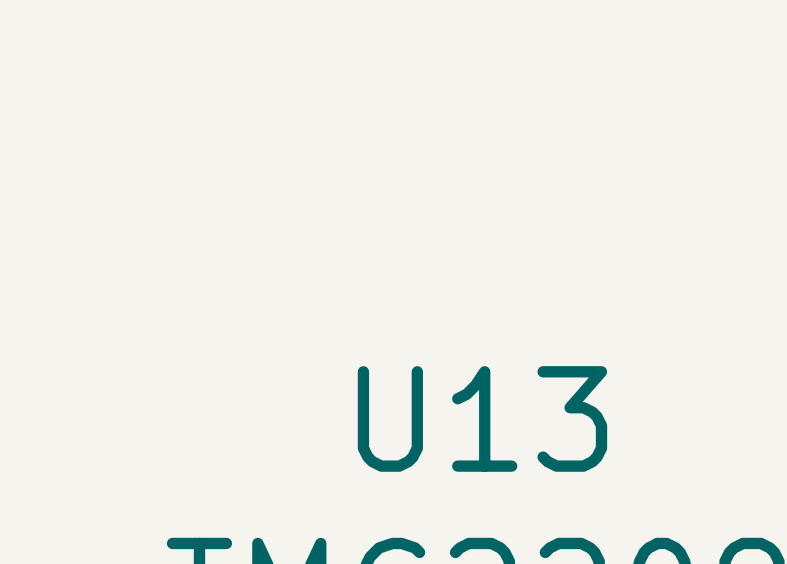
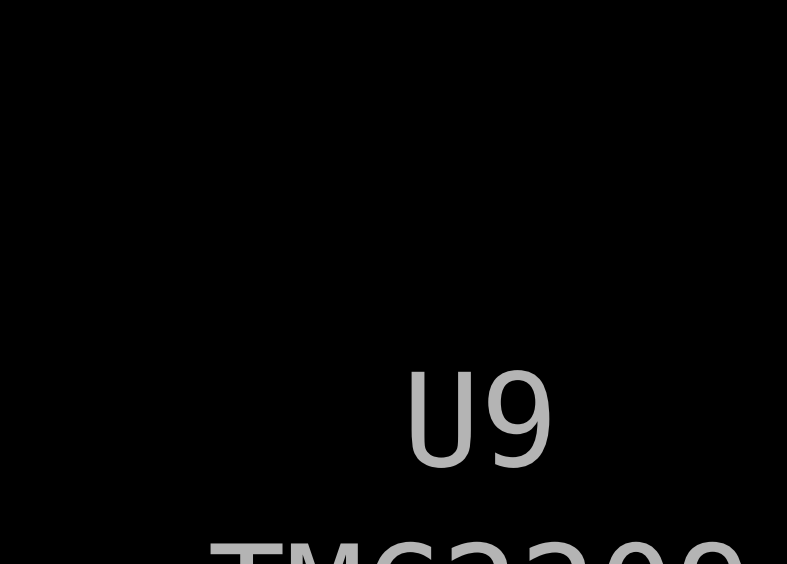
U13 name: U13 (482, 418) -> U9 (480, 419)

